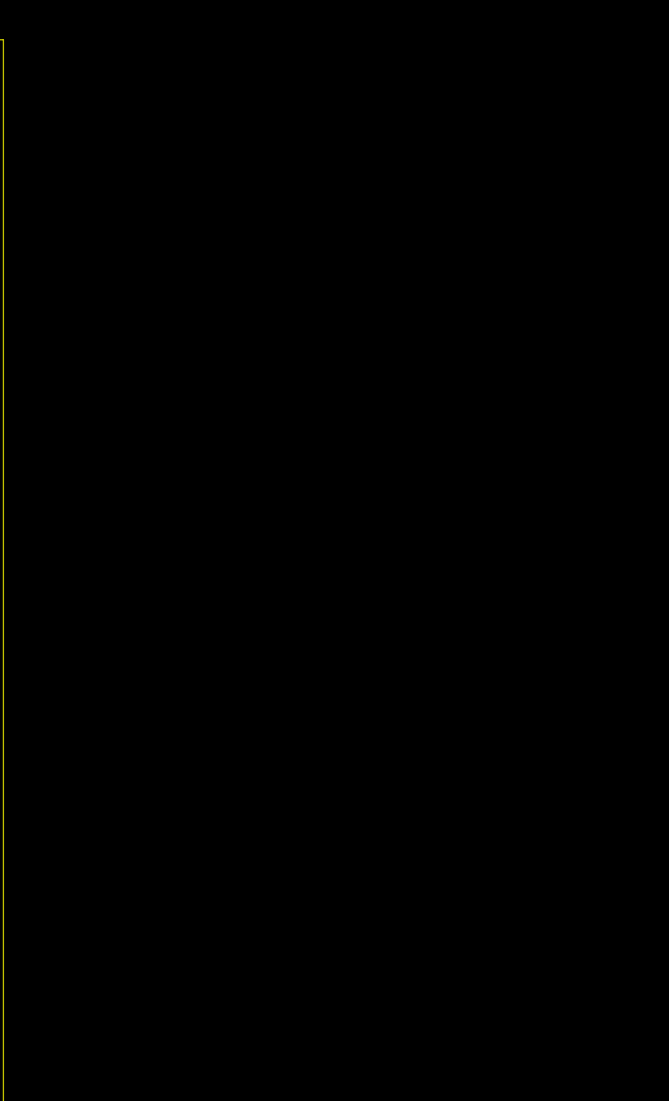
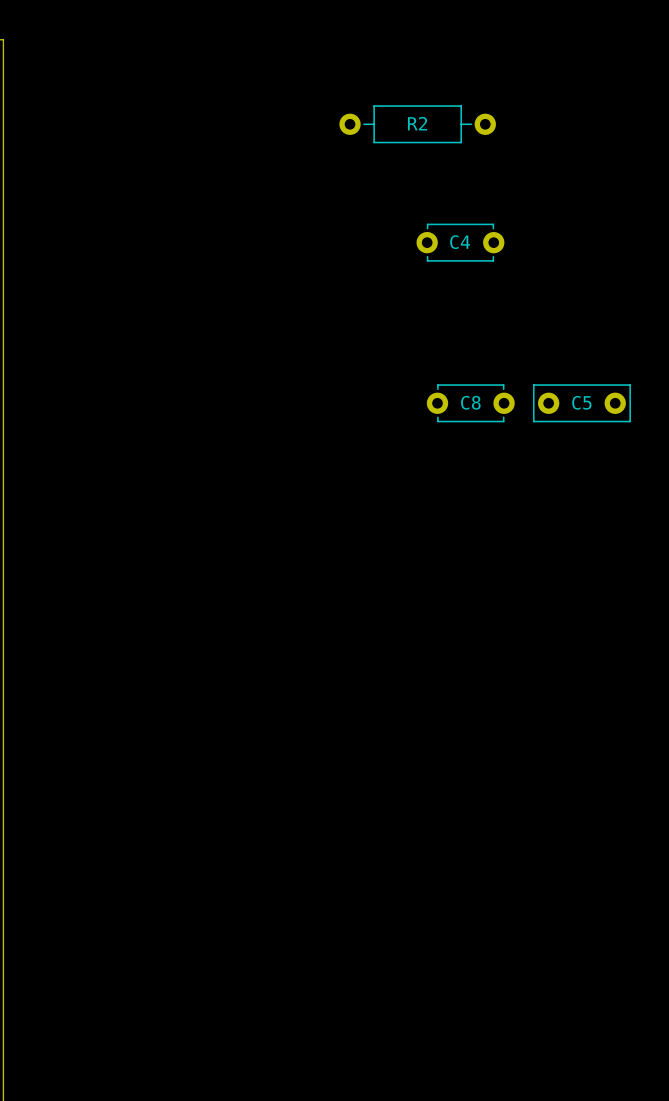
R2: none -> (417, 124)
C4: none -> (460, 242)
C8: none -> (470, 403)
C5: none -> (581, 403)

